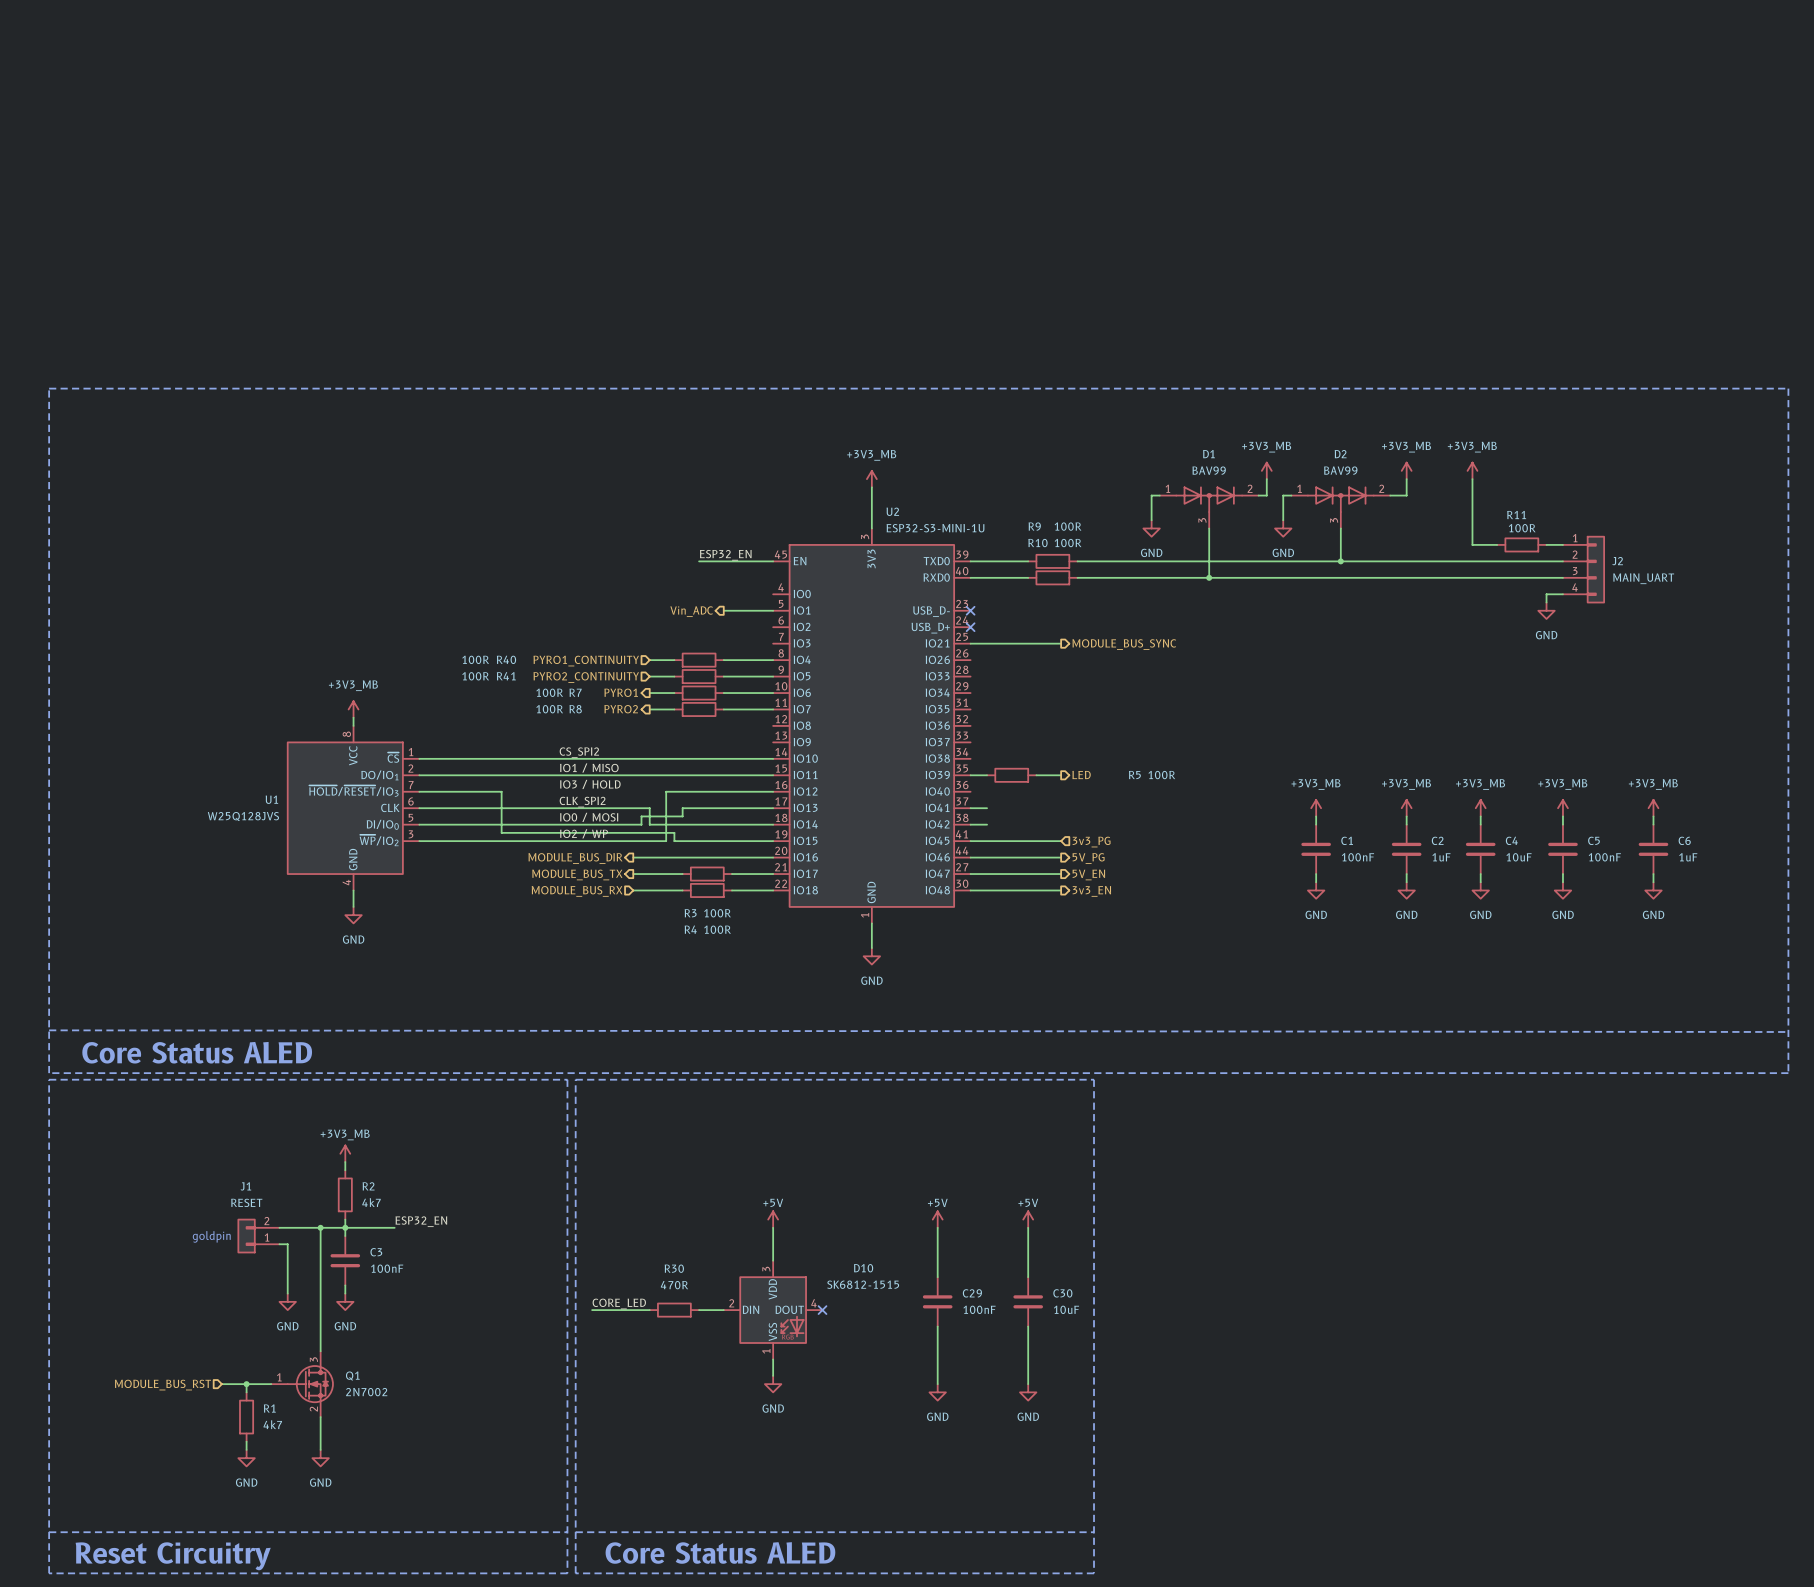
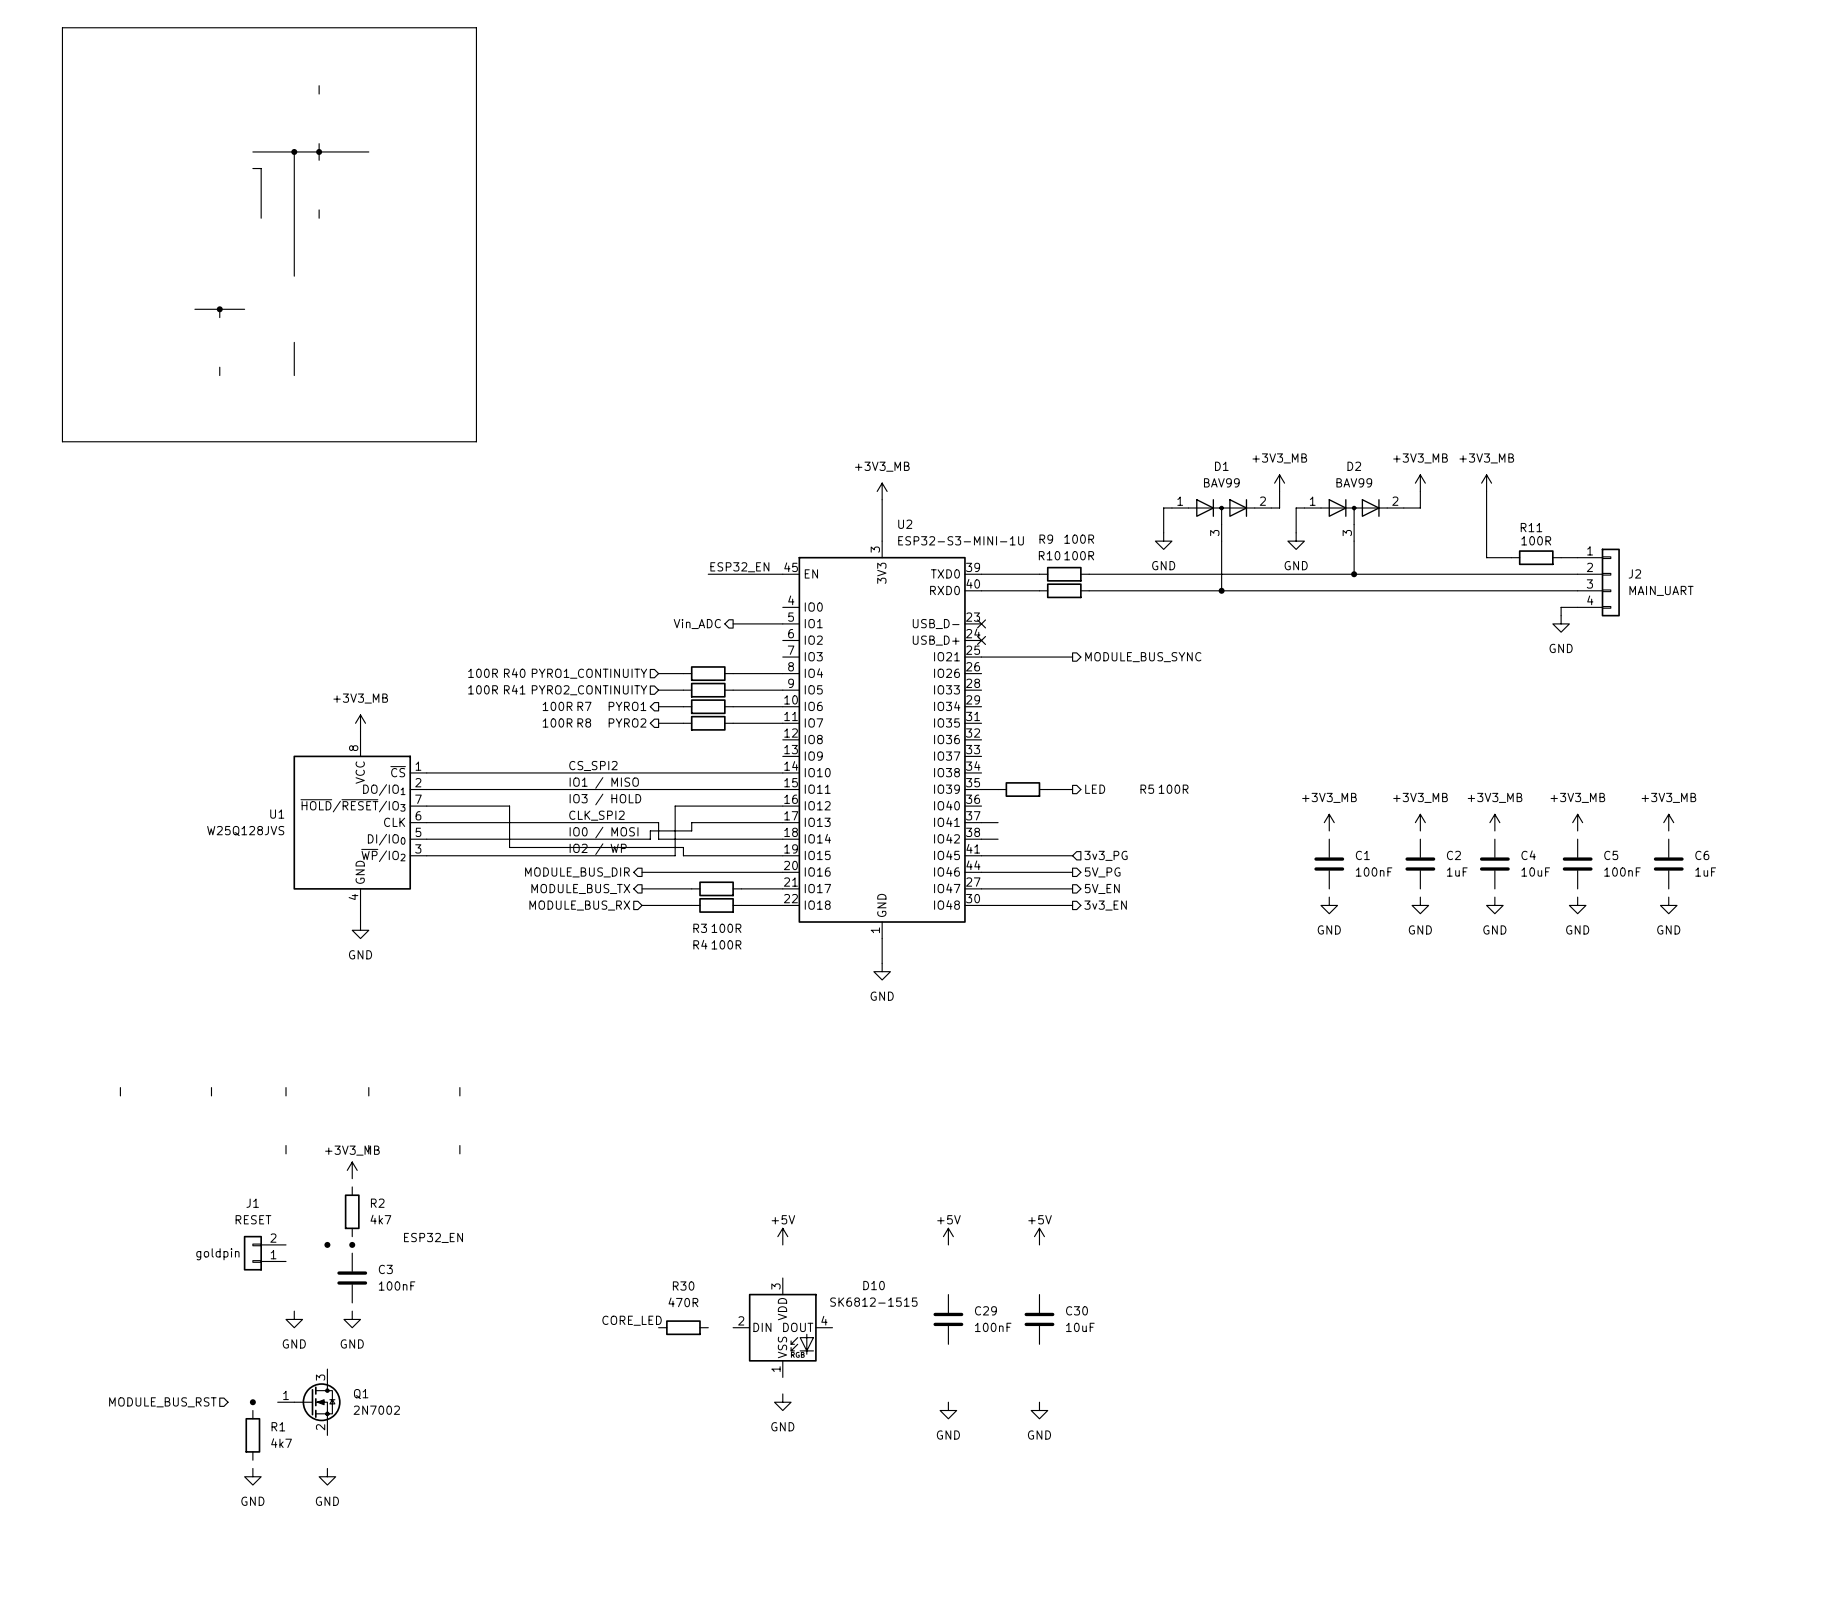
line: none -> (62, 27) (476, 27) (476, 441) (62, 441) (62, 27)
wire: none -> (319, 85) (319, 94)
wire: none -> (319, 143) (319, 160)
wire: none -> (252, 151) (368, 151)
wire: none -> (294, 151) (294, 276)
junction: none -> (294, 151)
junction: none -> (319, 151)
wire: none -> (252, 168) (261, 168) (261, 218)
wire: none -> (319, 209) (319, 218)
wire: none -> (194, 309) (244, 309)
wire: none -> (219, 309) (219, 317)
junction: none -> (219, 309)
wire: none -> (294, 342) (294, 375)
wire: none -> (219, 367) (219, 375)
line: (49, 388) (49, 1073) (1788, 1073) (1788, 388) (49, 388) -> none
wire: (1316, 816) (1316, 824) -> none
wire: (1406, 816) (1406, 824) -> none
wire: (1480, 816) (1480, 824) -> none
wire: (1562, 816) (1562, 824) -> none
wire: (1653, 816) (1653, 824) -> none
wire: (1316, 874) (1316, 882) -> none
wire: (1406, 874) (1406, 882) -> none
wire: (1480, 874) (1480, 882) -> none
wire: (1562, 874) (1562, 882) -> none
wire: (1653, 874) (1653, 882) -> none
line: (49, 1030) (1788, 1032) -> none
text: Core Status ALED (197, 1052) -> none
wire: none -> (120, 1087) (120, 1095)
wire: none -> (211, 1087) (211, 1095)
wire: none -> (286, 1087) (286, 1095)
wire: none -> (368, 1087) (368, 1095)
wire: none -> (459, 1087) (459, 1095)
line: (49, 1079) (567, 1079) (567, 1573) (49, 1573) (49, 1079) -> none
line: (575, 1079) (1094, 1079) (1094, 1573) (575, 1573) (575, 1079) -> none
wire: none -> (286, 1145) (286, 1153)
wire: none -> (459, 1145) (459, 1153)
wire: (345, 1161) (345, 1170) -> (368, 1145) (368, 1153)
wire: (345, 1219) (345, 1236) -> none
wire: (279, 1227) (394, 1227) -> none
wire: (320, 1227) (320, 1351) -> none
wire: (773, 1227) (773, 1260) -> none
wire: (937, 1227) (937, 1277) -> none
wire: (1028, 1227) (1028, 1277) -> none
wire: (279, 1244) (287, 1244) (287, 1293) -> none
wire: (345, 1285) (345, 1293) -> none
wire: (592, 1310) (649, 1310) -> none
wire: (699, 1310) (723, 1310) -> none
no-connect mark: (822, 1310) -> none
wire: (937, 1326) (937, 1384) -> none
wire: (1028, 1326) (1028, 1384) -> none
wire: (773, 1359) (773, 1375) -> none
wire: (221, 1384) (271, 1384) -> none
wire: (246, 1384) (246, 1392) -> none
wire: (320, 1417) (320, 1449) -> none
wire: (246, 1441) (246, 1449) -> none
line: (49, 1532) (567, 1532) -> none
line: (575, 1532) (1094, 1532) -> none
text: Core Status ALED (720, 1552) -> none
text: Reset Circuitry (173, 1556) -> none

